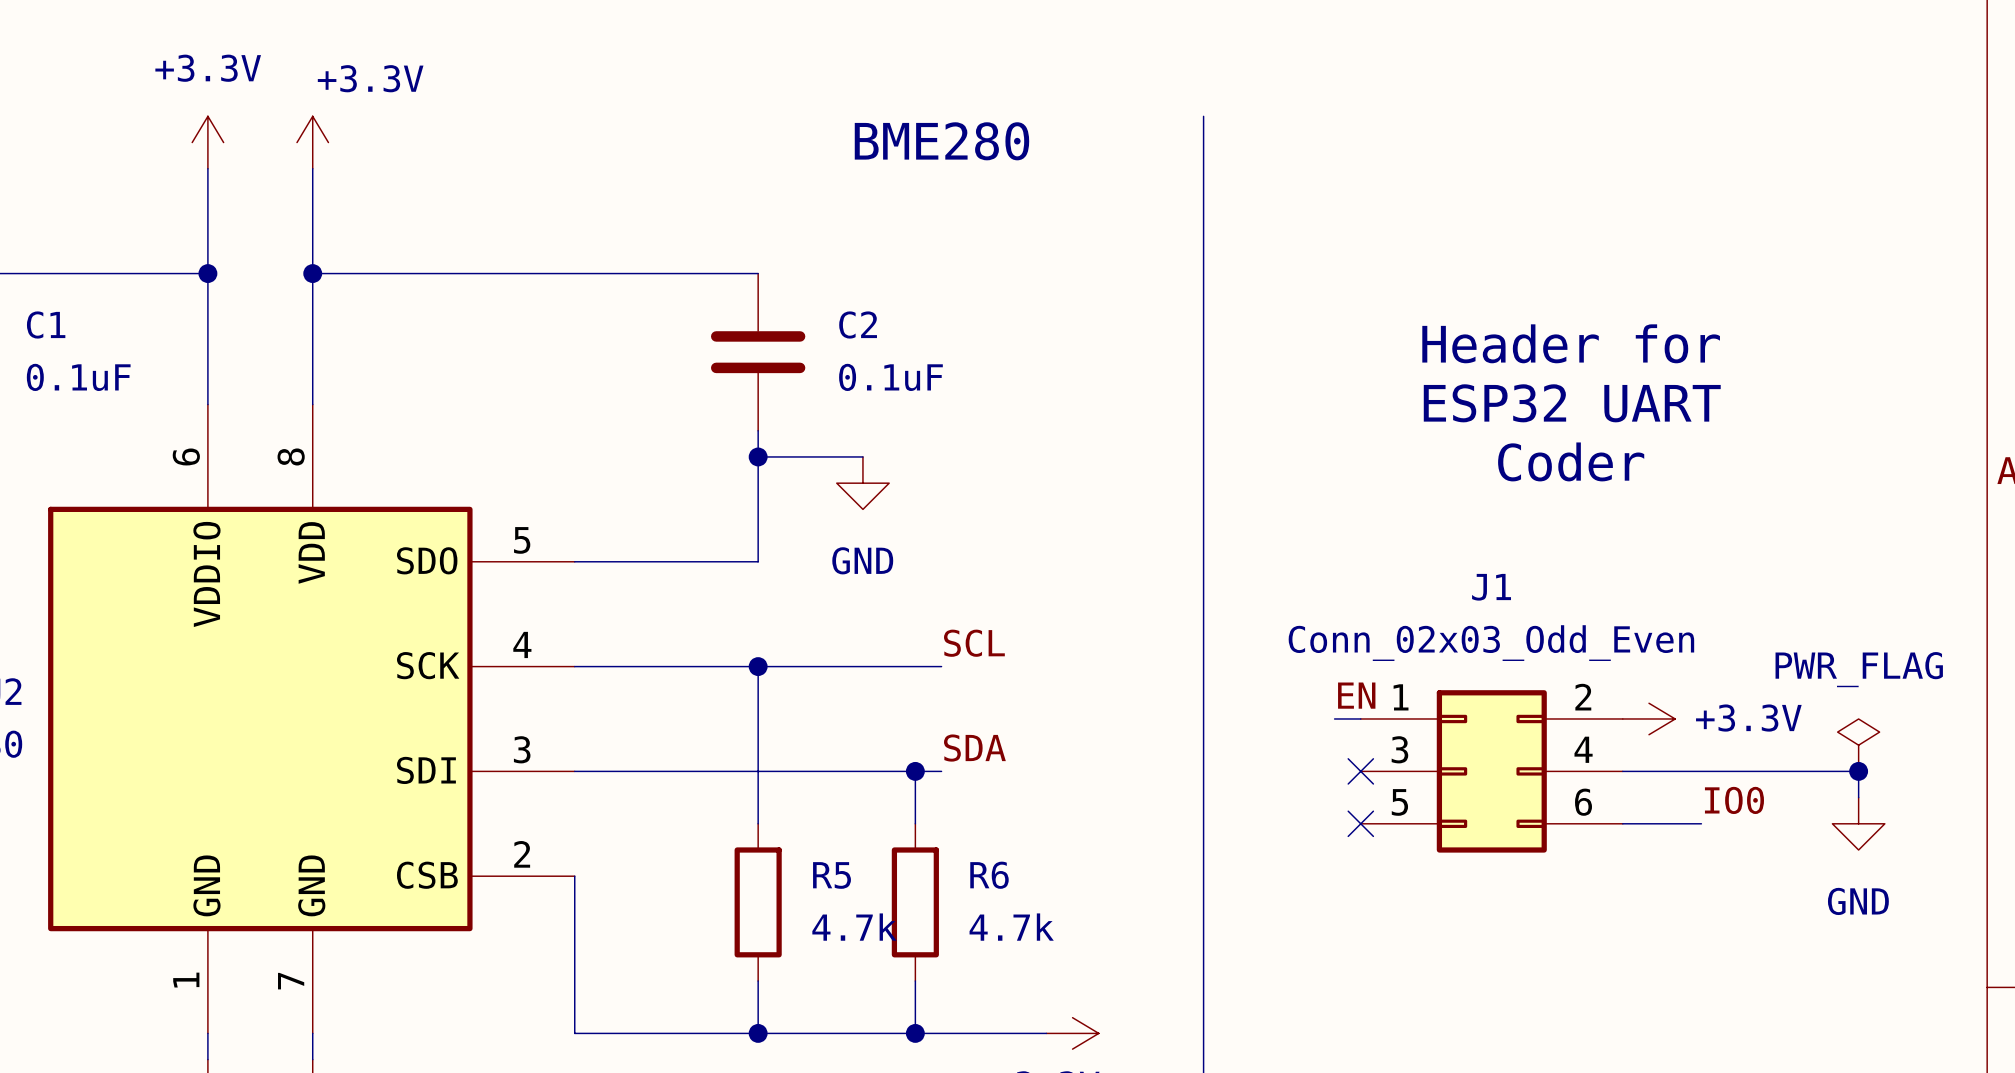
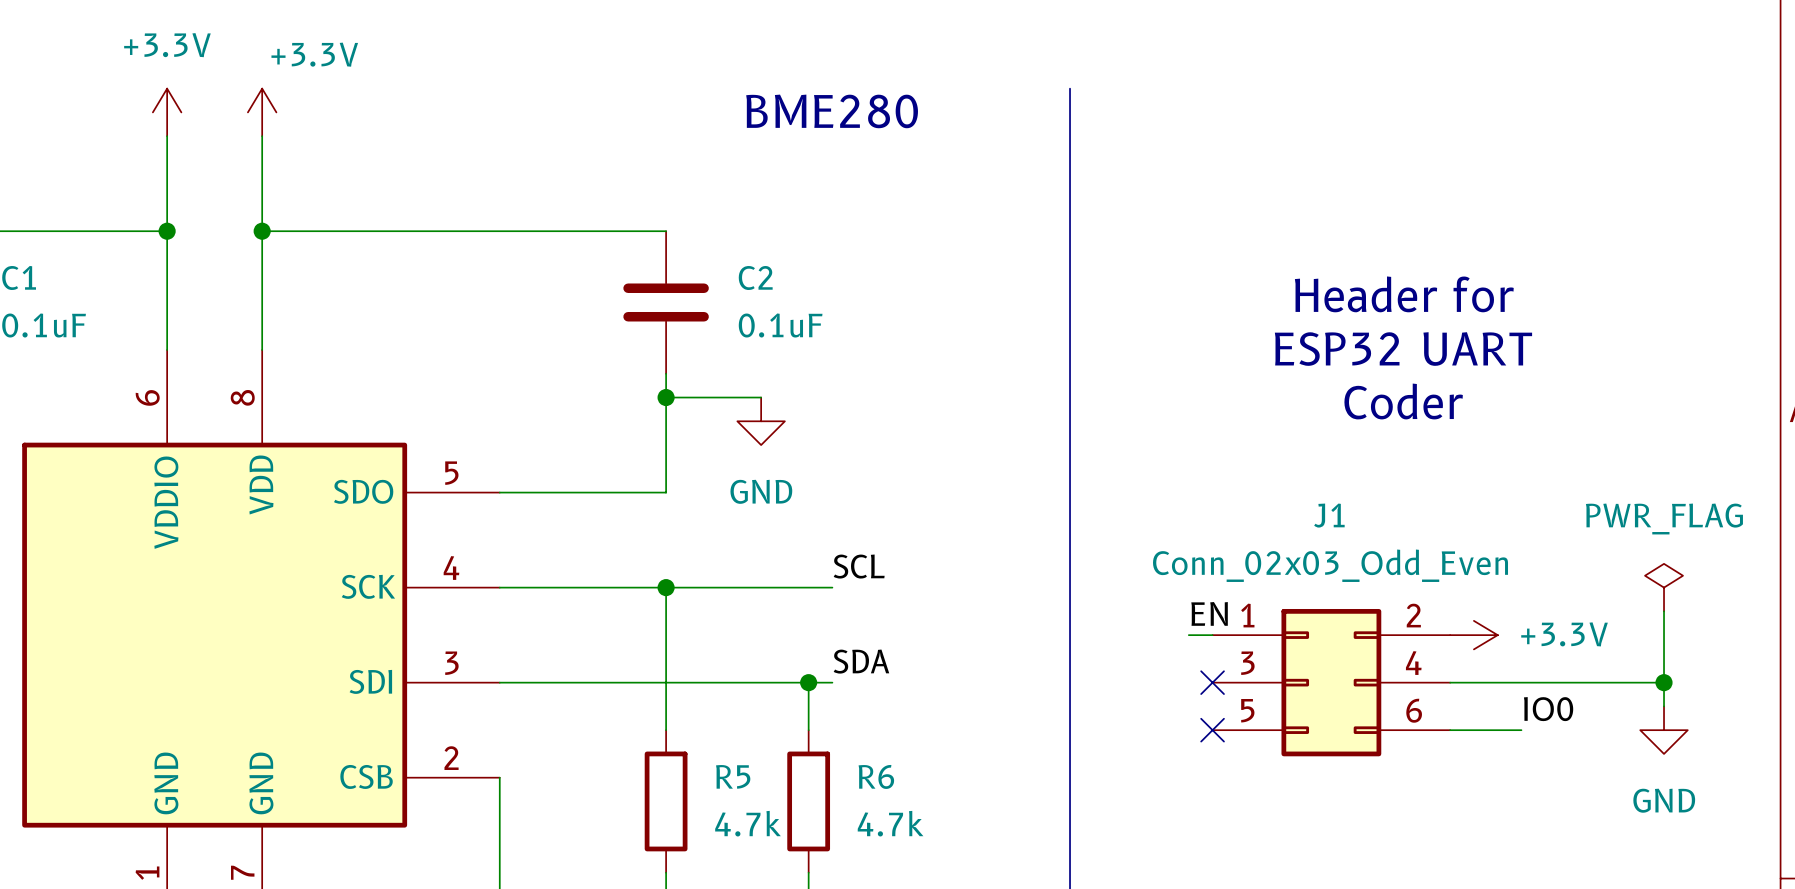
wire: none -> (1664, 611) (1664, 682)
power symbol position: PWR_FLAG (1858, 745) -> PWR_FLAG (1664, 587)

